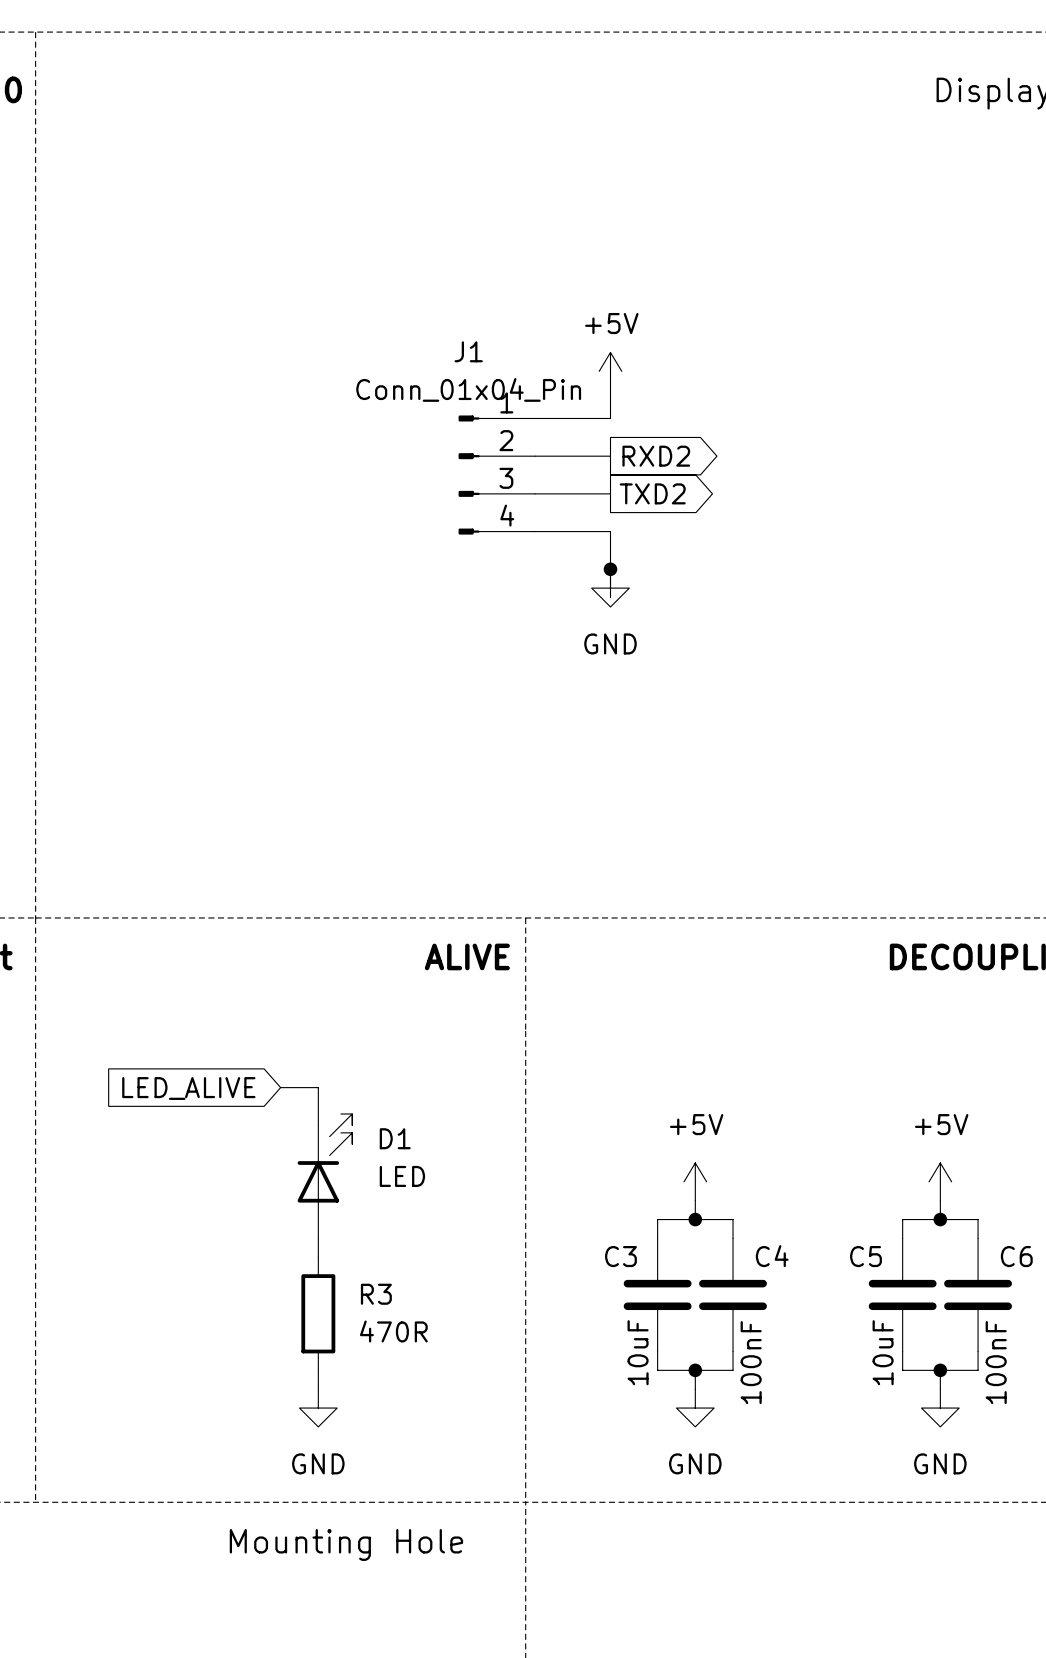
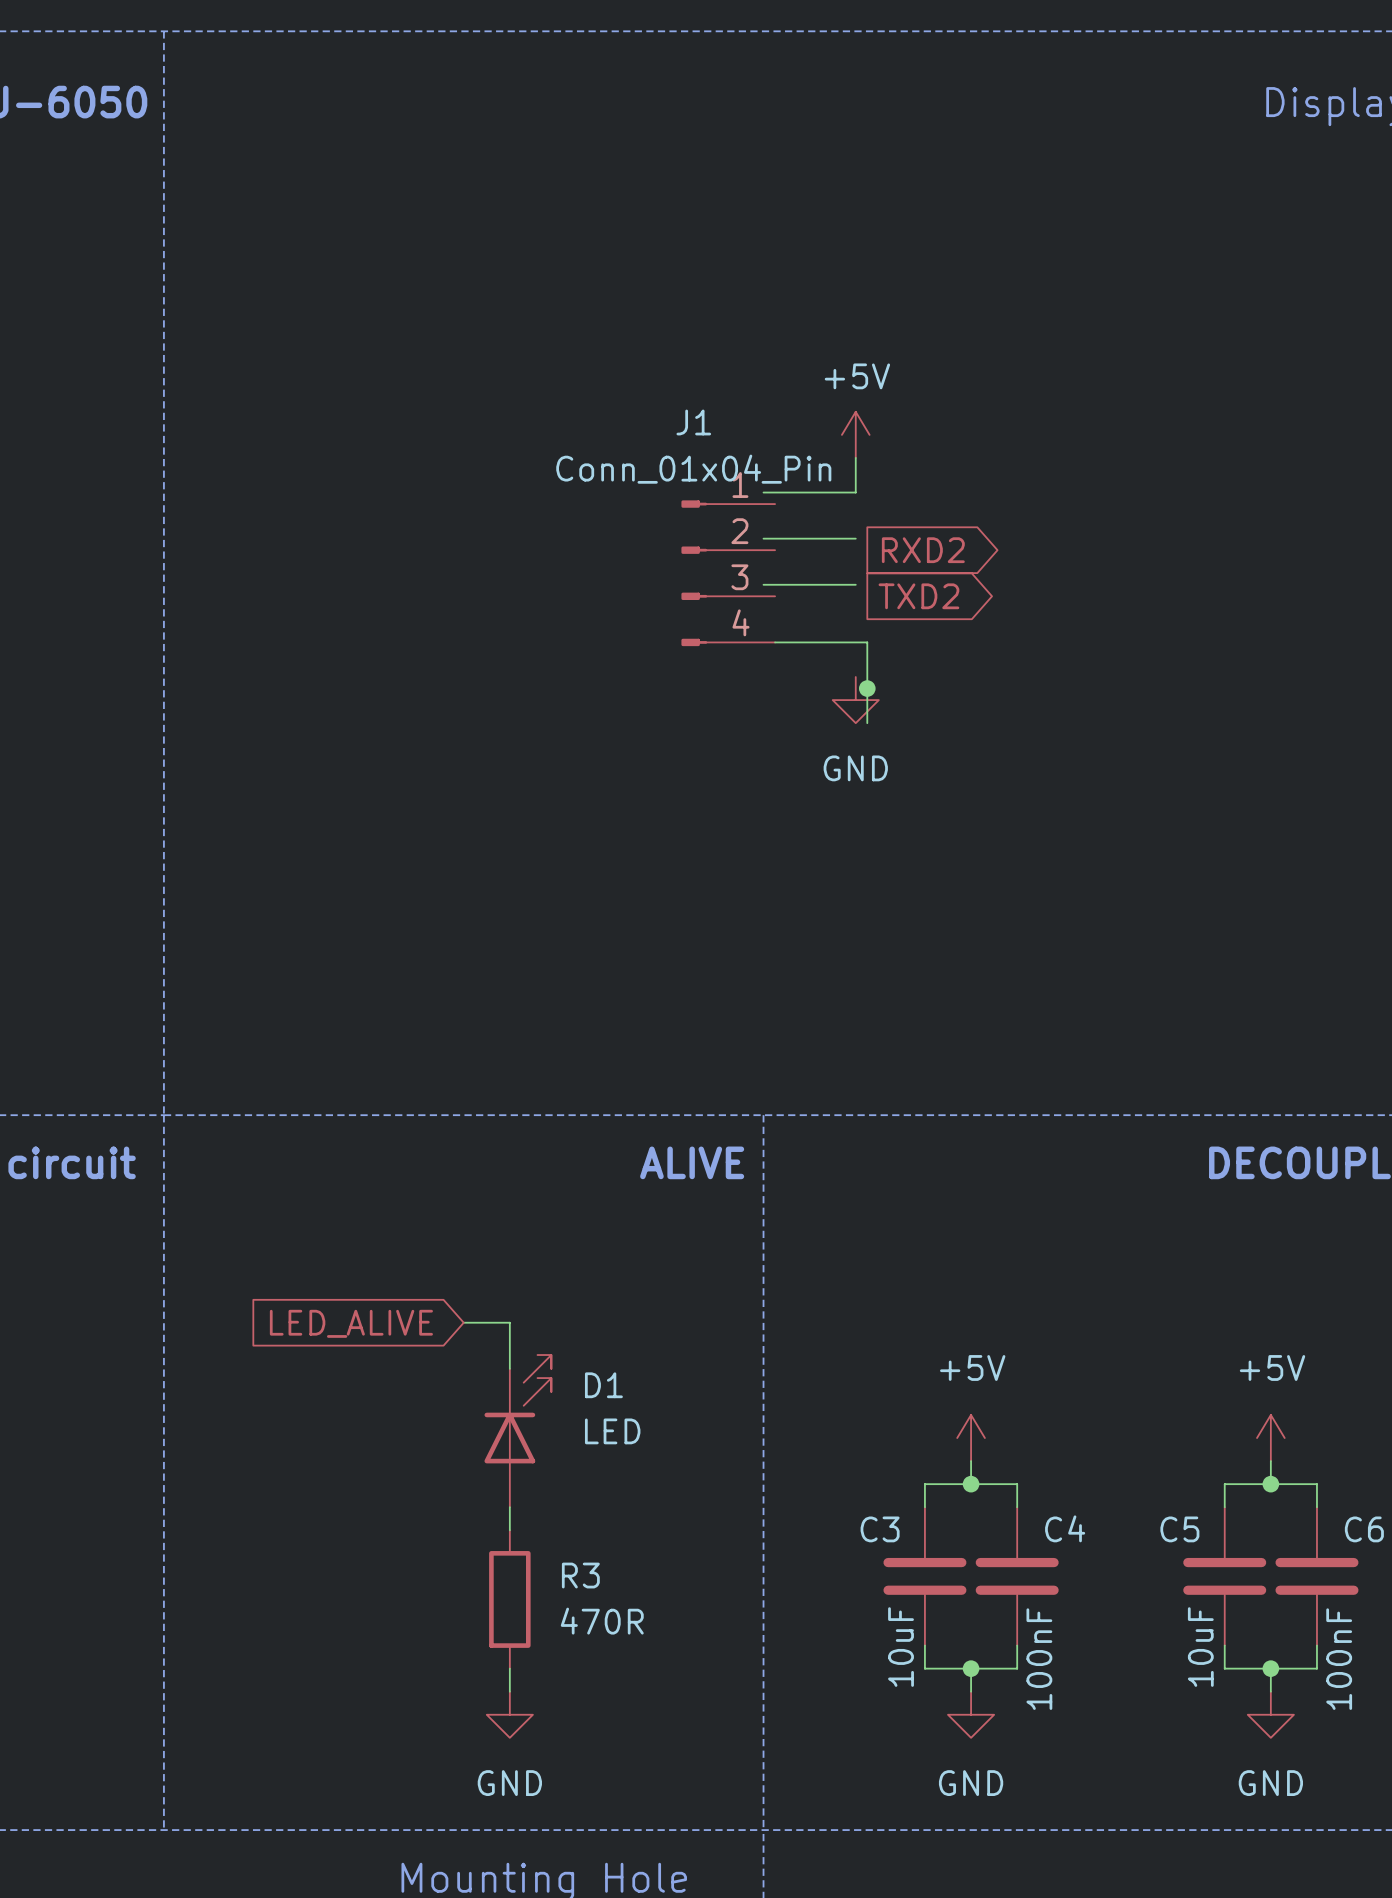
power symbol position: +5V (610, 371) -> +5V (855, 434)
wire: (610, 390) (610, 418) (535, 418) -> (855, 457) (855, 492) (763, 492)
wire: (535, 456) (610, 456) -> (763, 538) (855, 538)
wire: (535, 493) (610, 493) -> (763, 584) (855, 584)
power symbol position: GND (610, 588) -> GND (855, 700)

